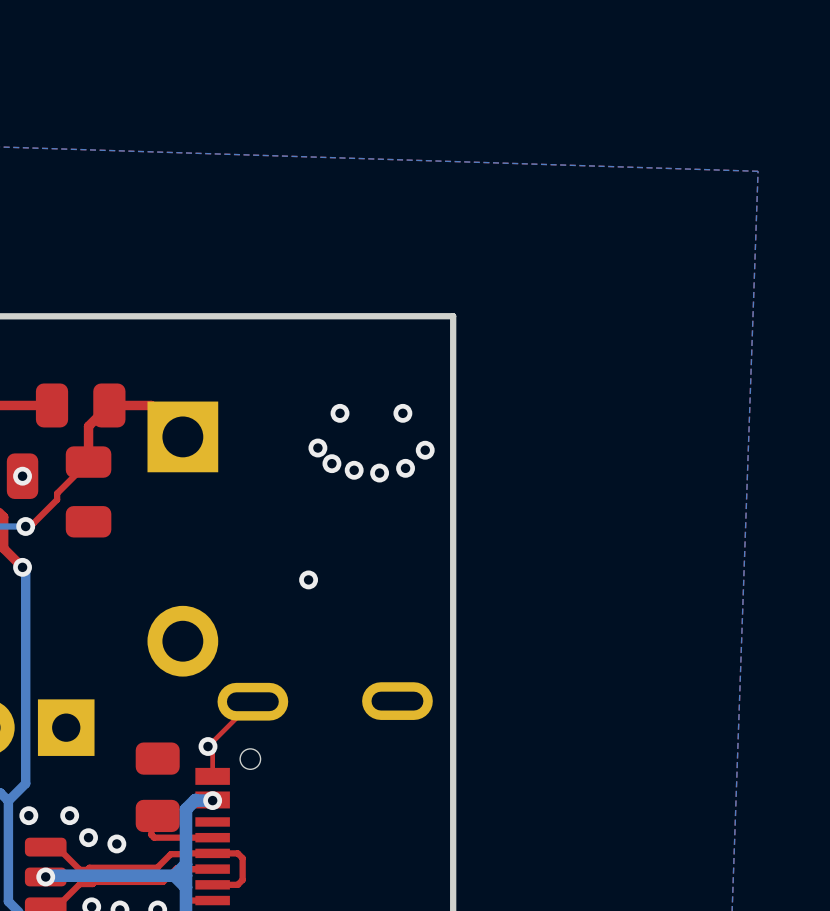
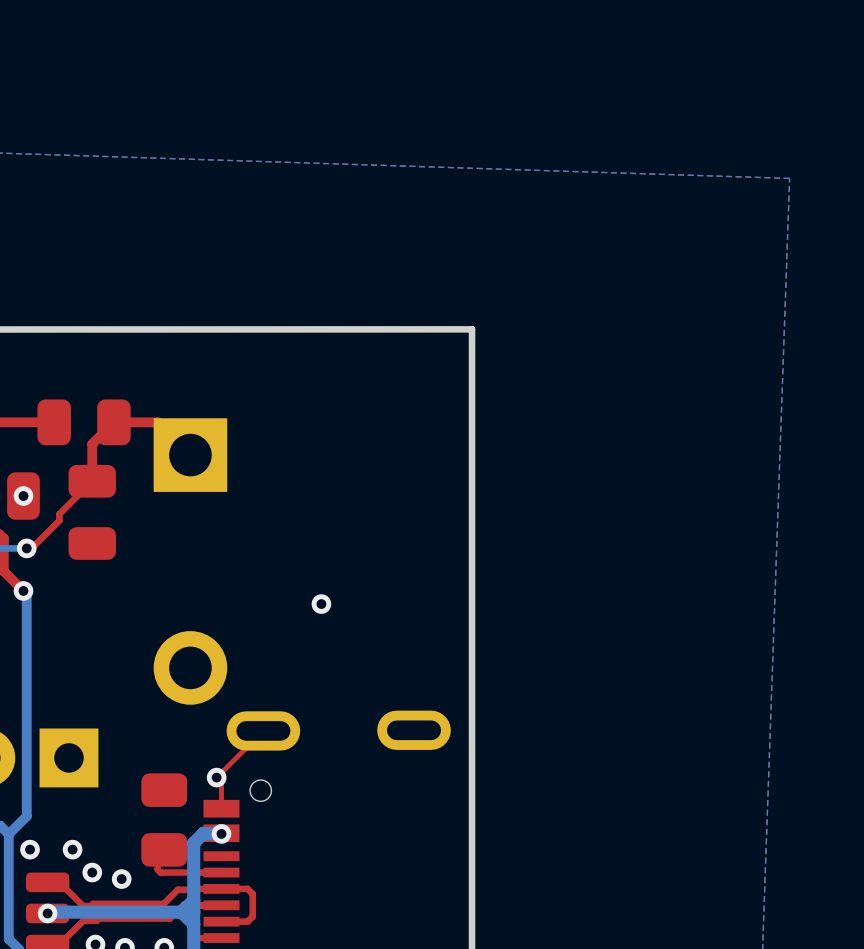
via: (340, 413) -> none
via: (402, 413) -> none
via: (317, 448) -> none
via: (425, 450) -> none
via: (331, 463) -> none
via: (405, 468) -> none
via: (354, 470) -> none
via: (379, 473) -> none

